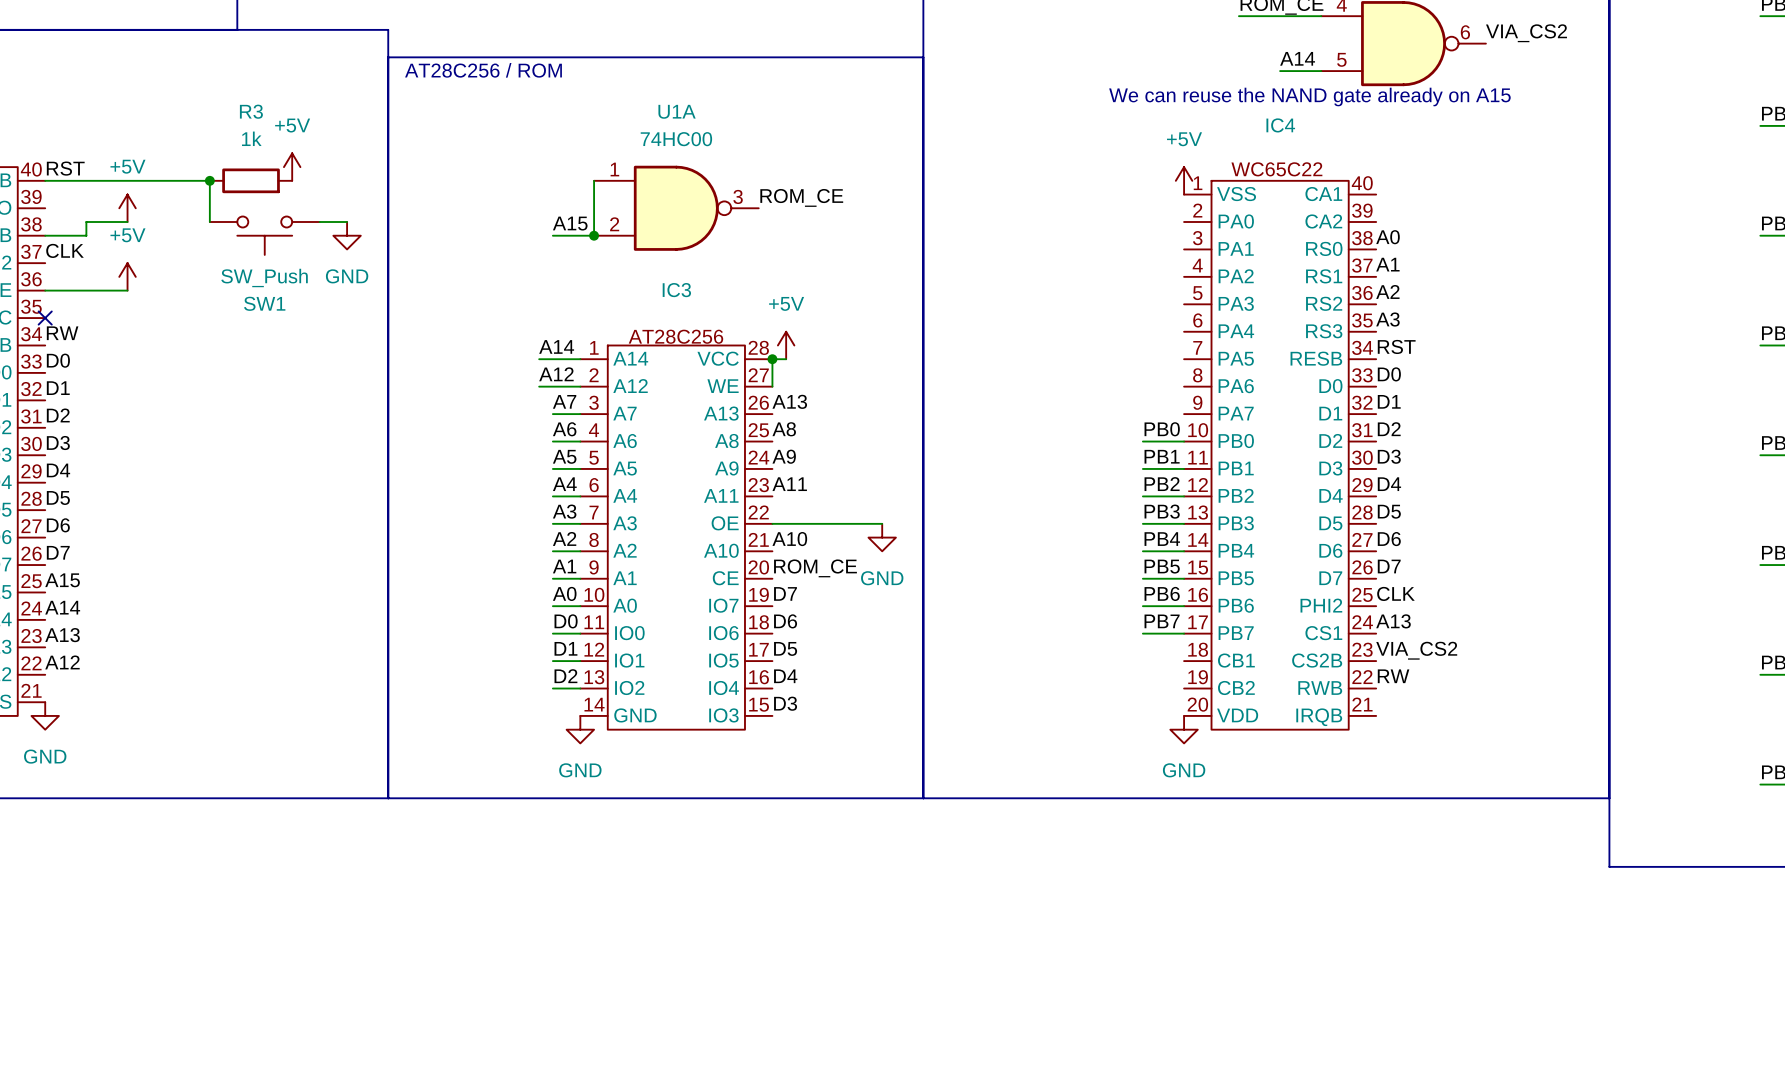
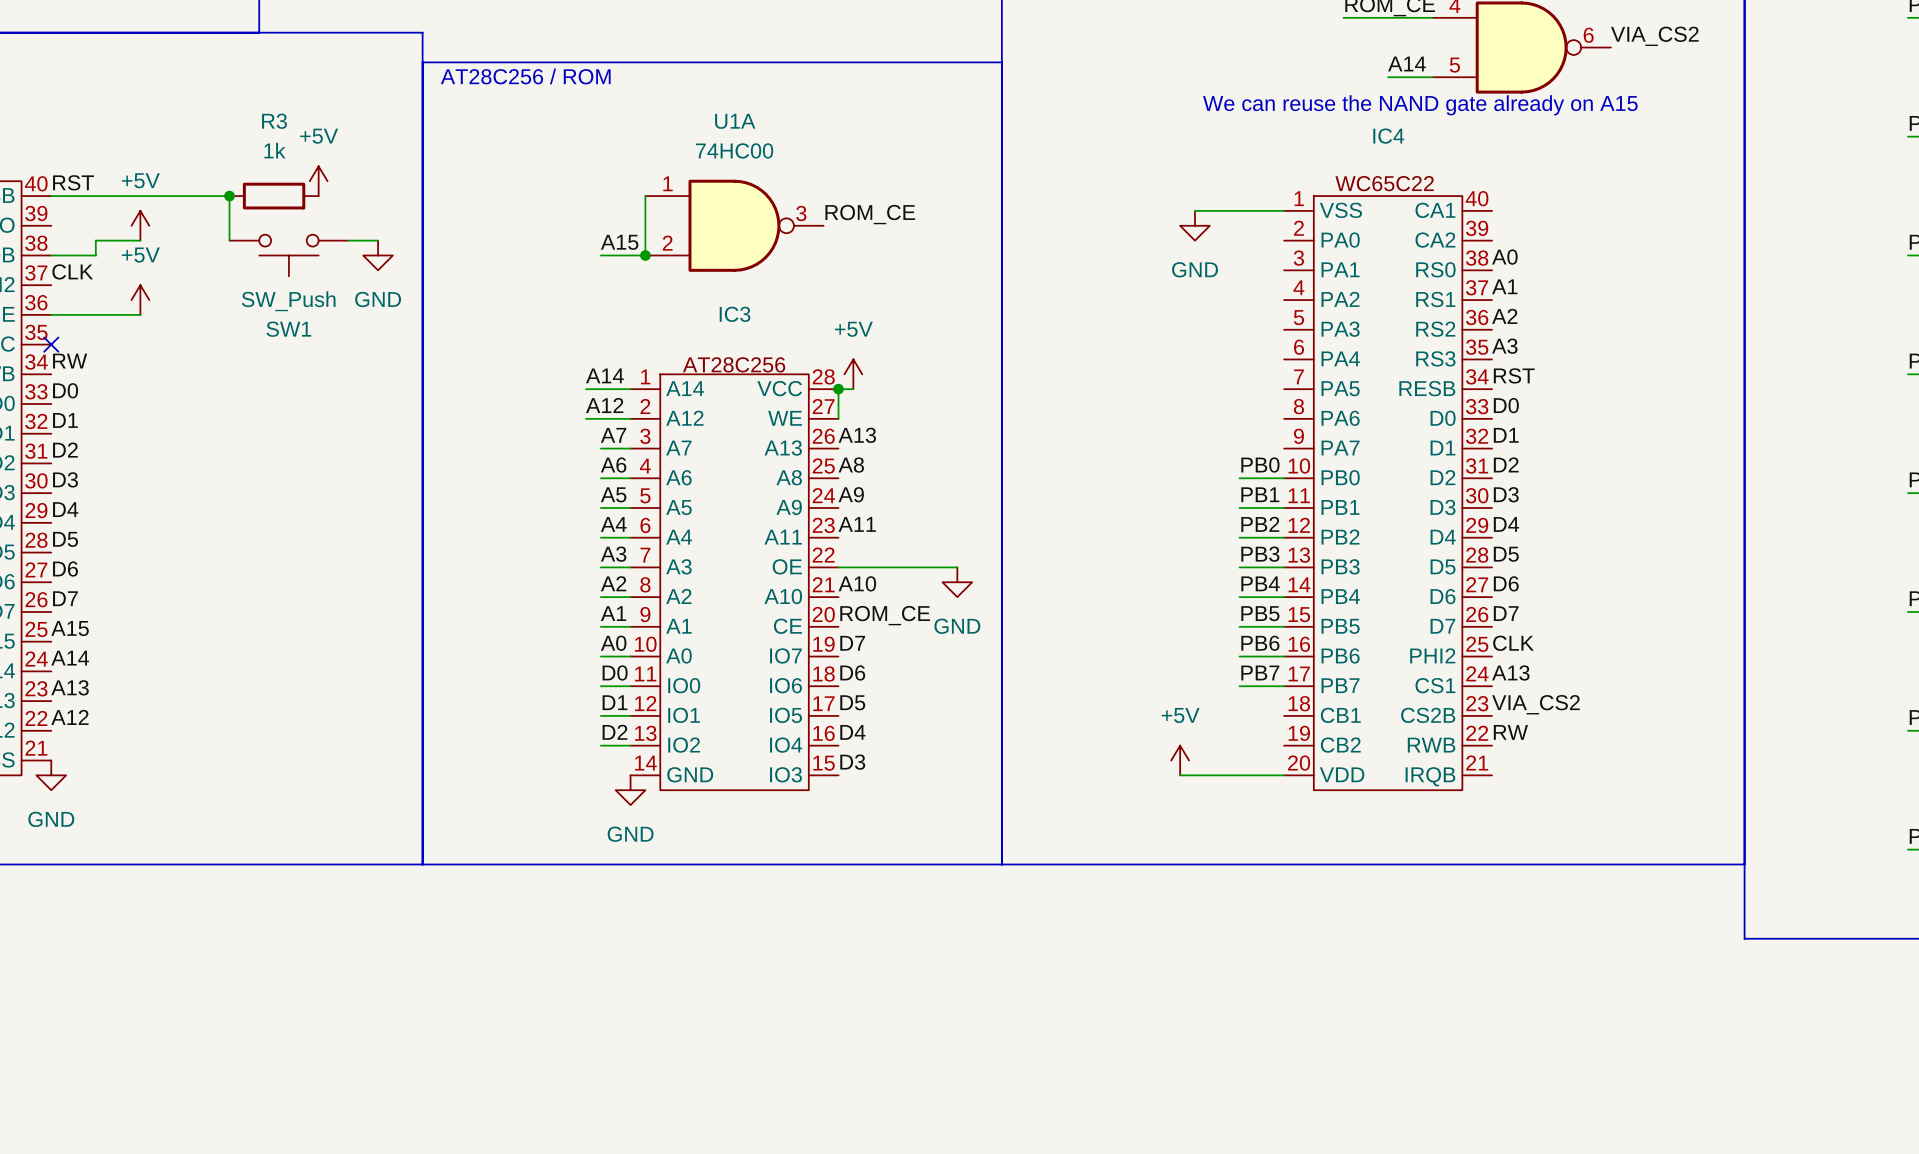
power symbol: +5V (1184, 180) -> none
wire: none -> (1195, 210) (1284, 210)
power symbol: none -> GND (1195, 225)
power symbol: none -> +5V (1180, 760)
wire: none -> (1180, 775) (1284, 775)
power symbol: GND (1184, 729) -> none

